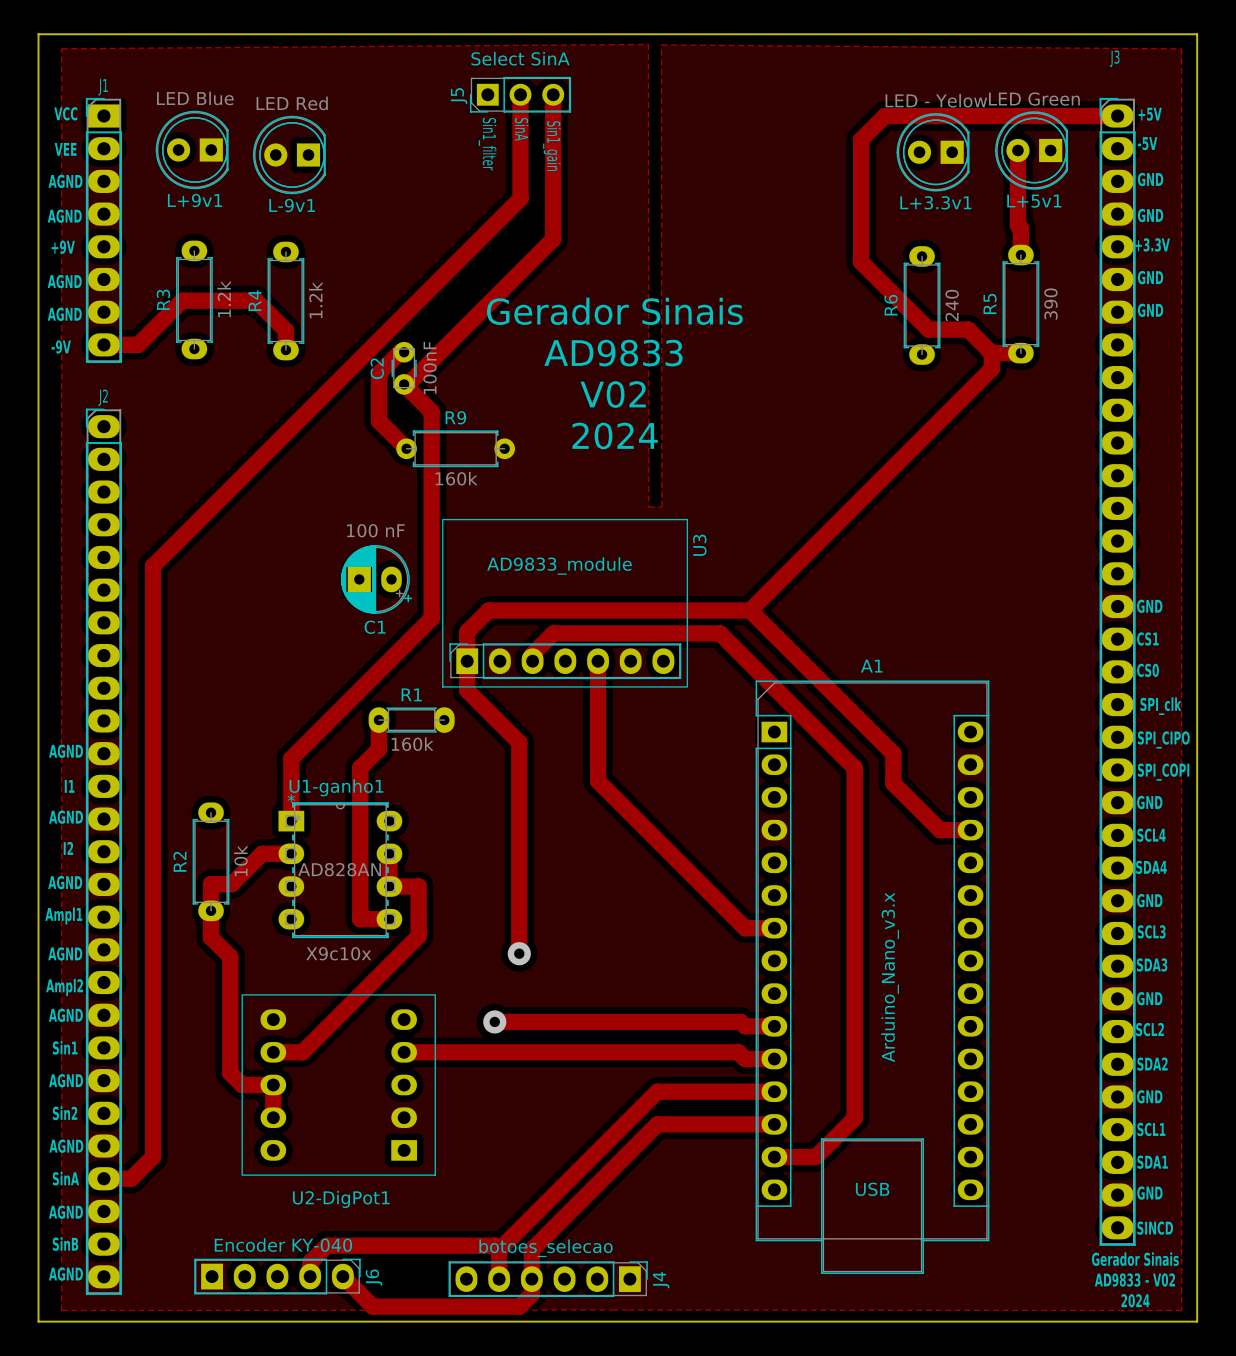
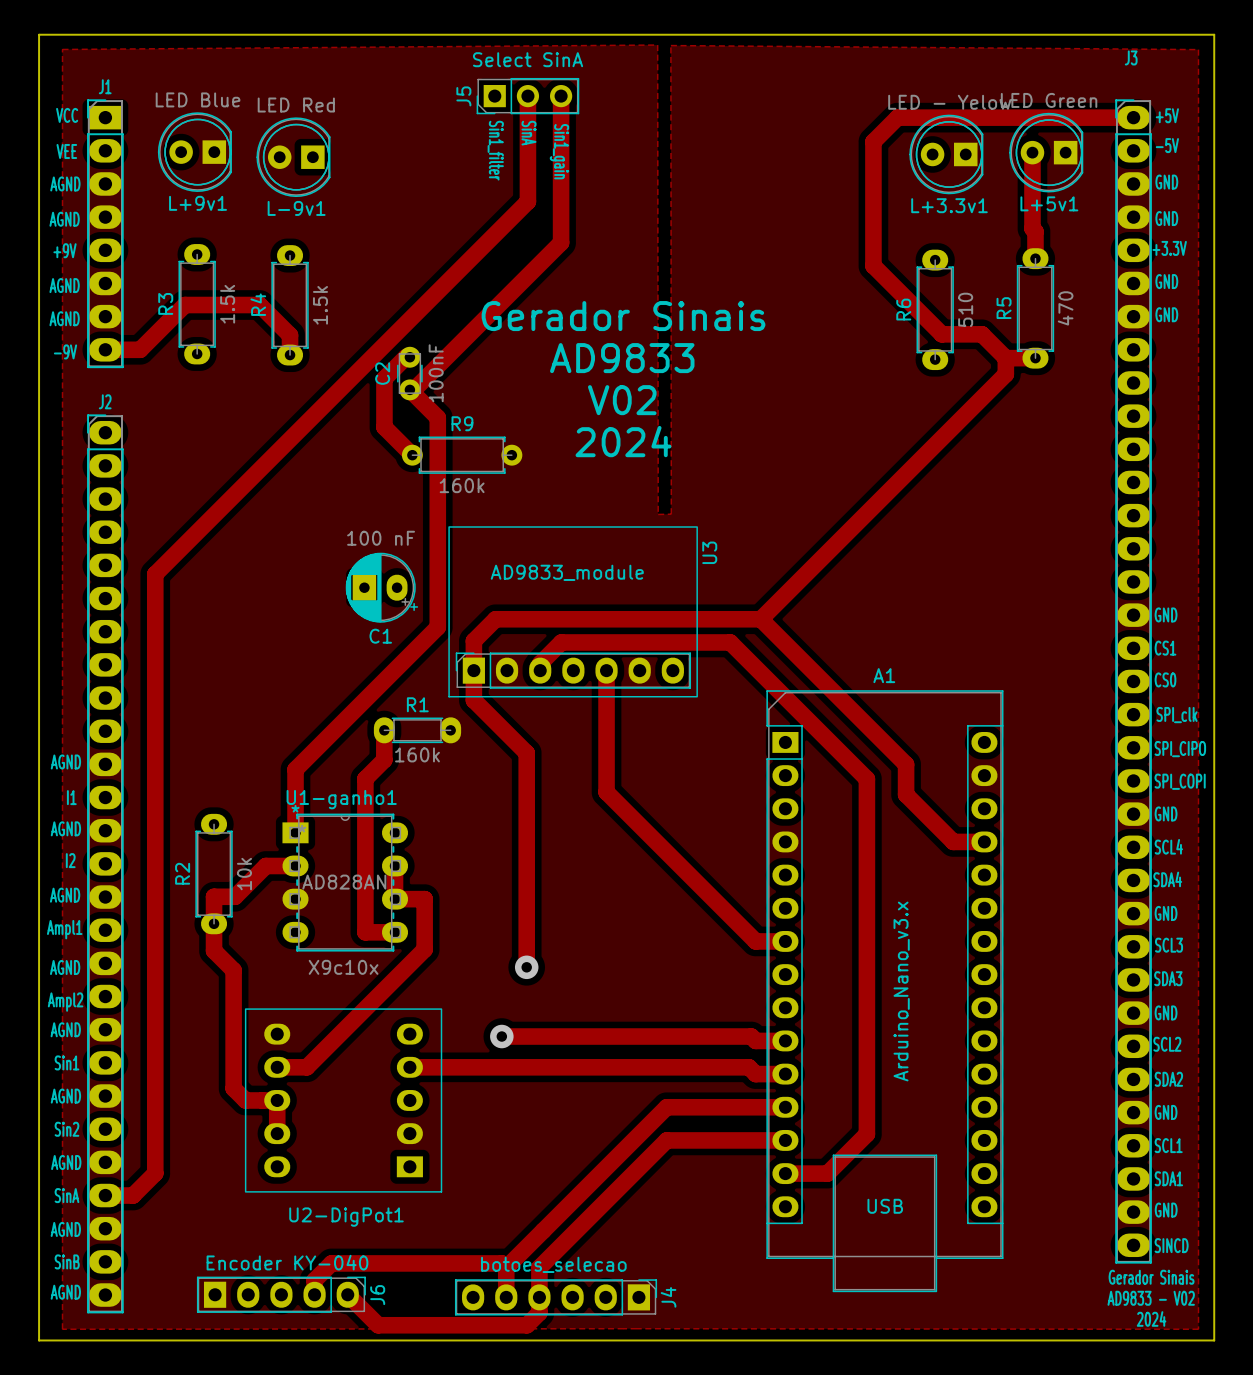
R3 value: 1.2k (224, 299) -> 1.5k (227, 304)
R4 value: 1.2k (315, 300) -> 1.5k (320, 305)
R5 value: 390 (1050, 303) -> 470 (1065, 308)
R6 value: 240 (952, 305) -> 510 (965, 309)

